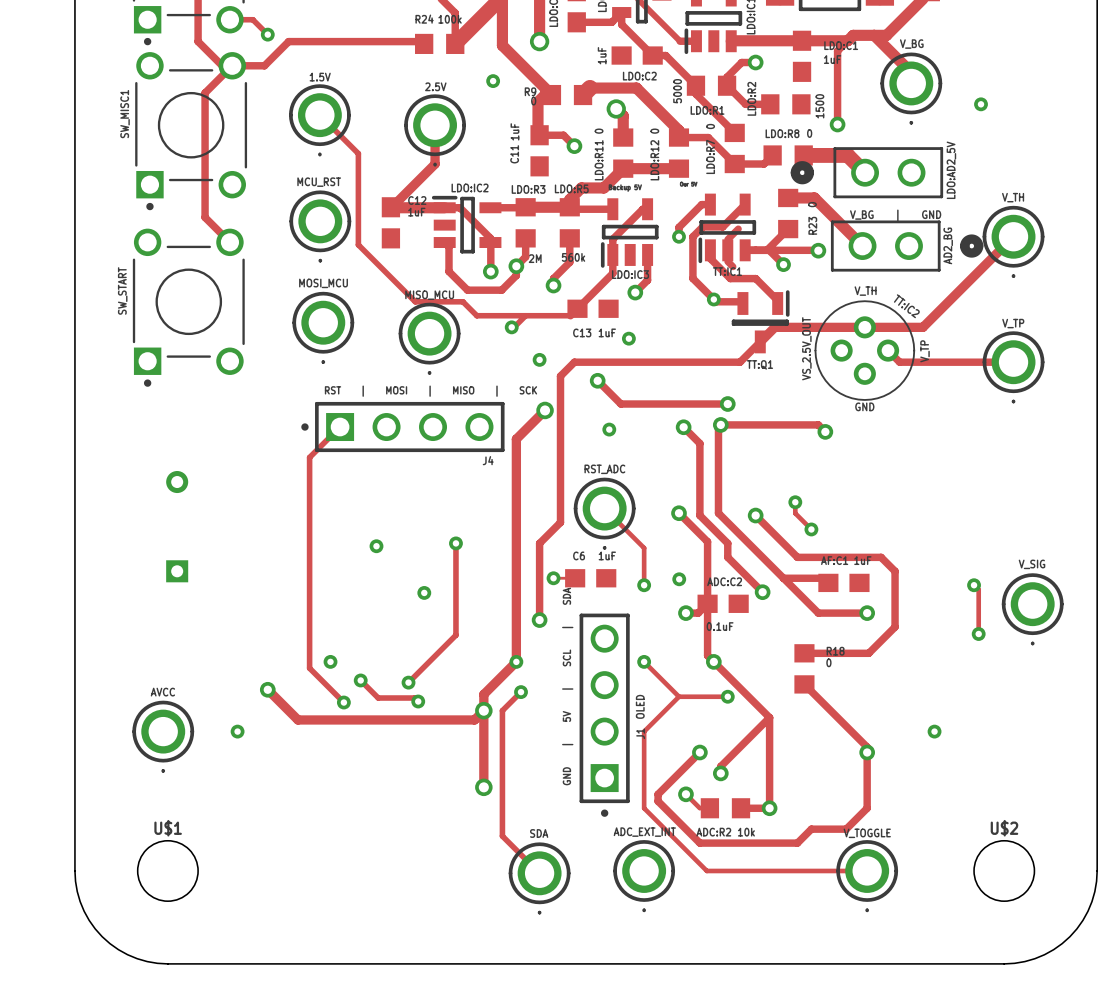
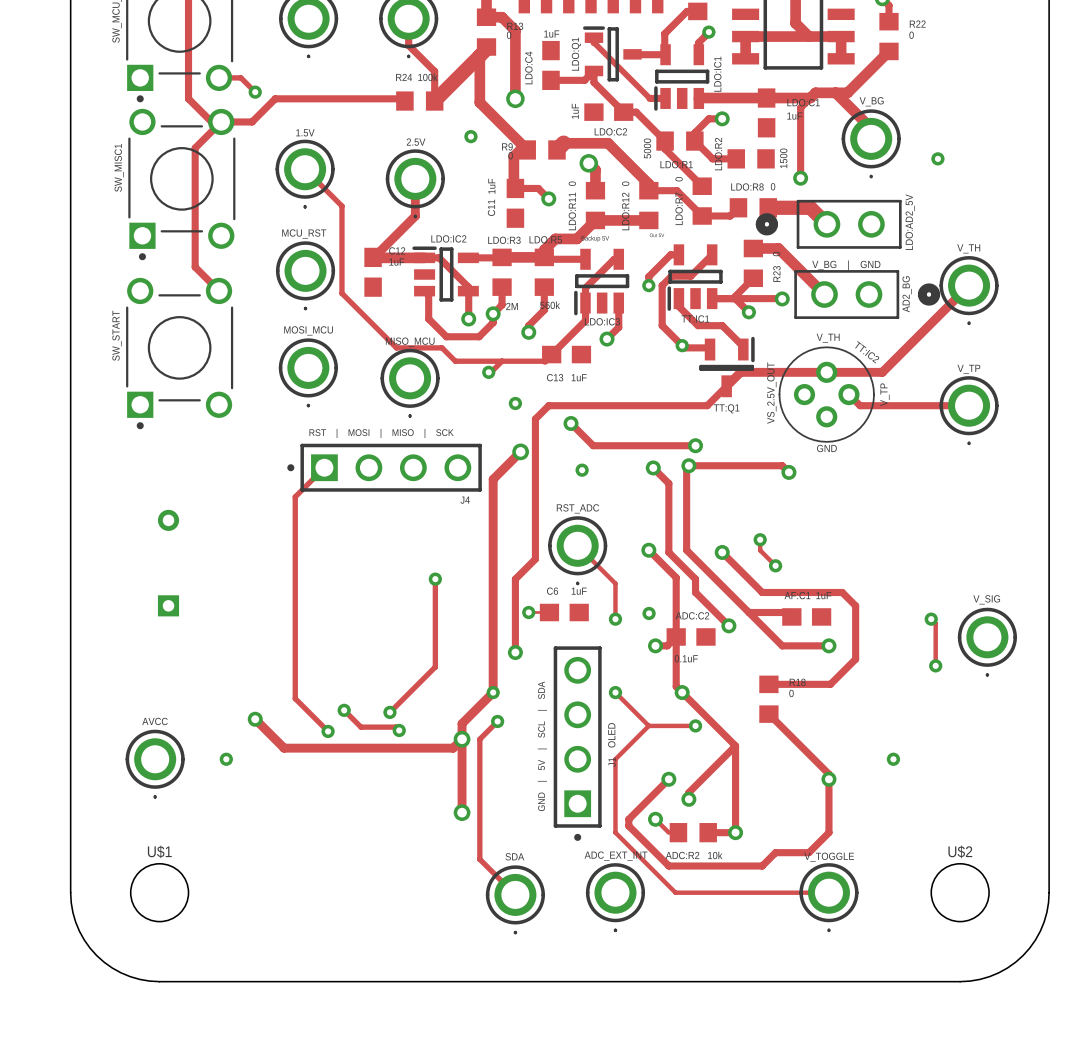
track: (738, 228) (727, 239) (727, 261) (732, 266) -> none
via: (628, 338) -> none
via: (376, 546) -> none
via: (424, 592) -> none
via: (330, 661) -> none

